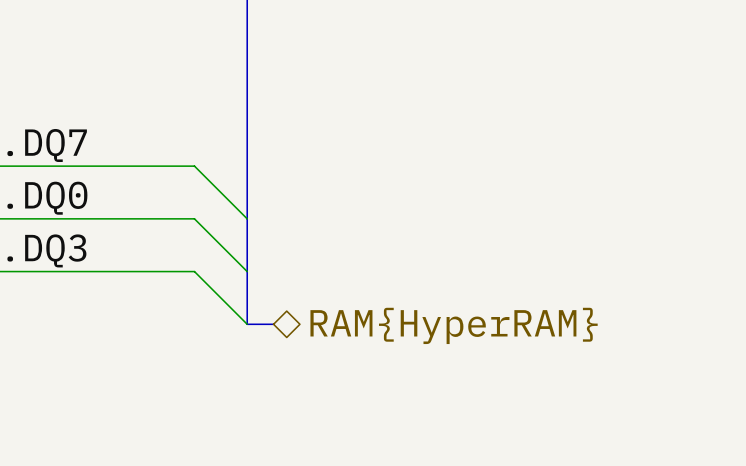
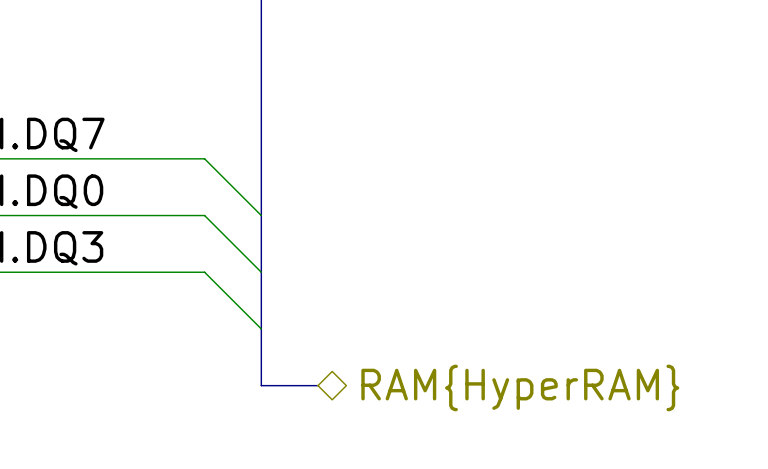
bus: (247, 324) (273, 324) -> (261, 328) (261, 385) (318, 385)
hierarchical label position: RAM{HyperRAM} (454, 325) -> RAM{HyperRAM} (520, 387)

